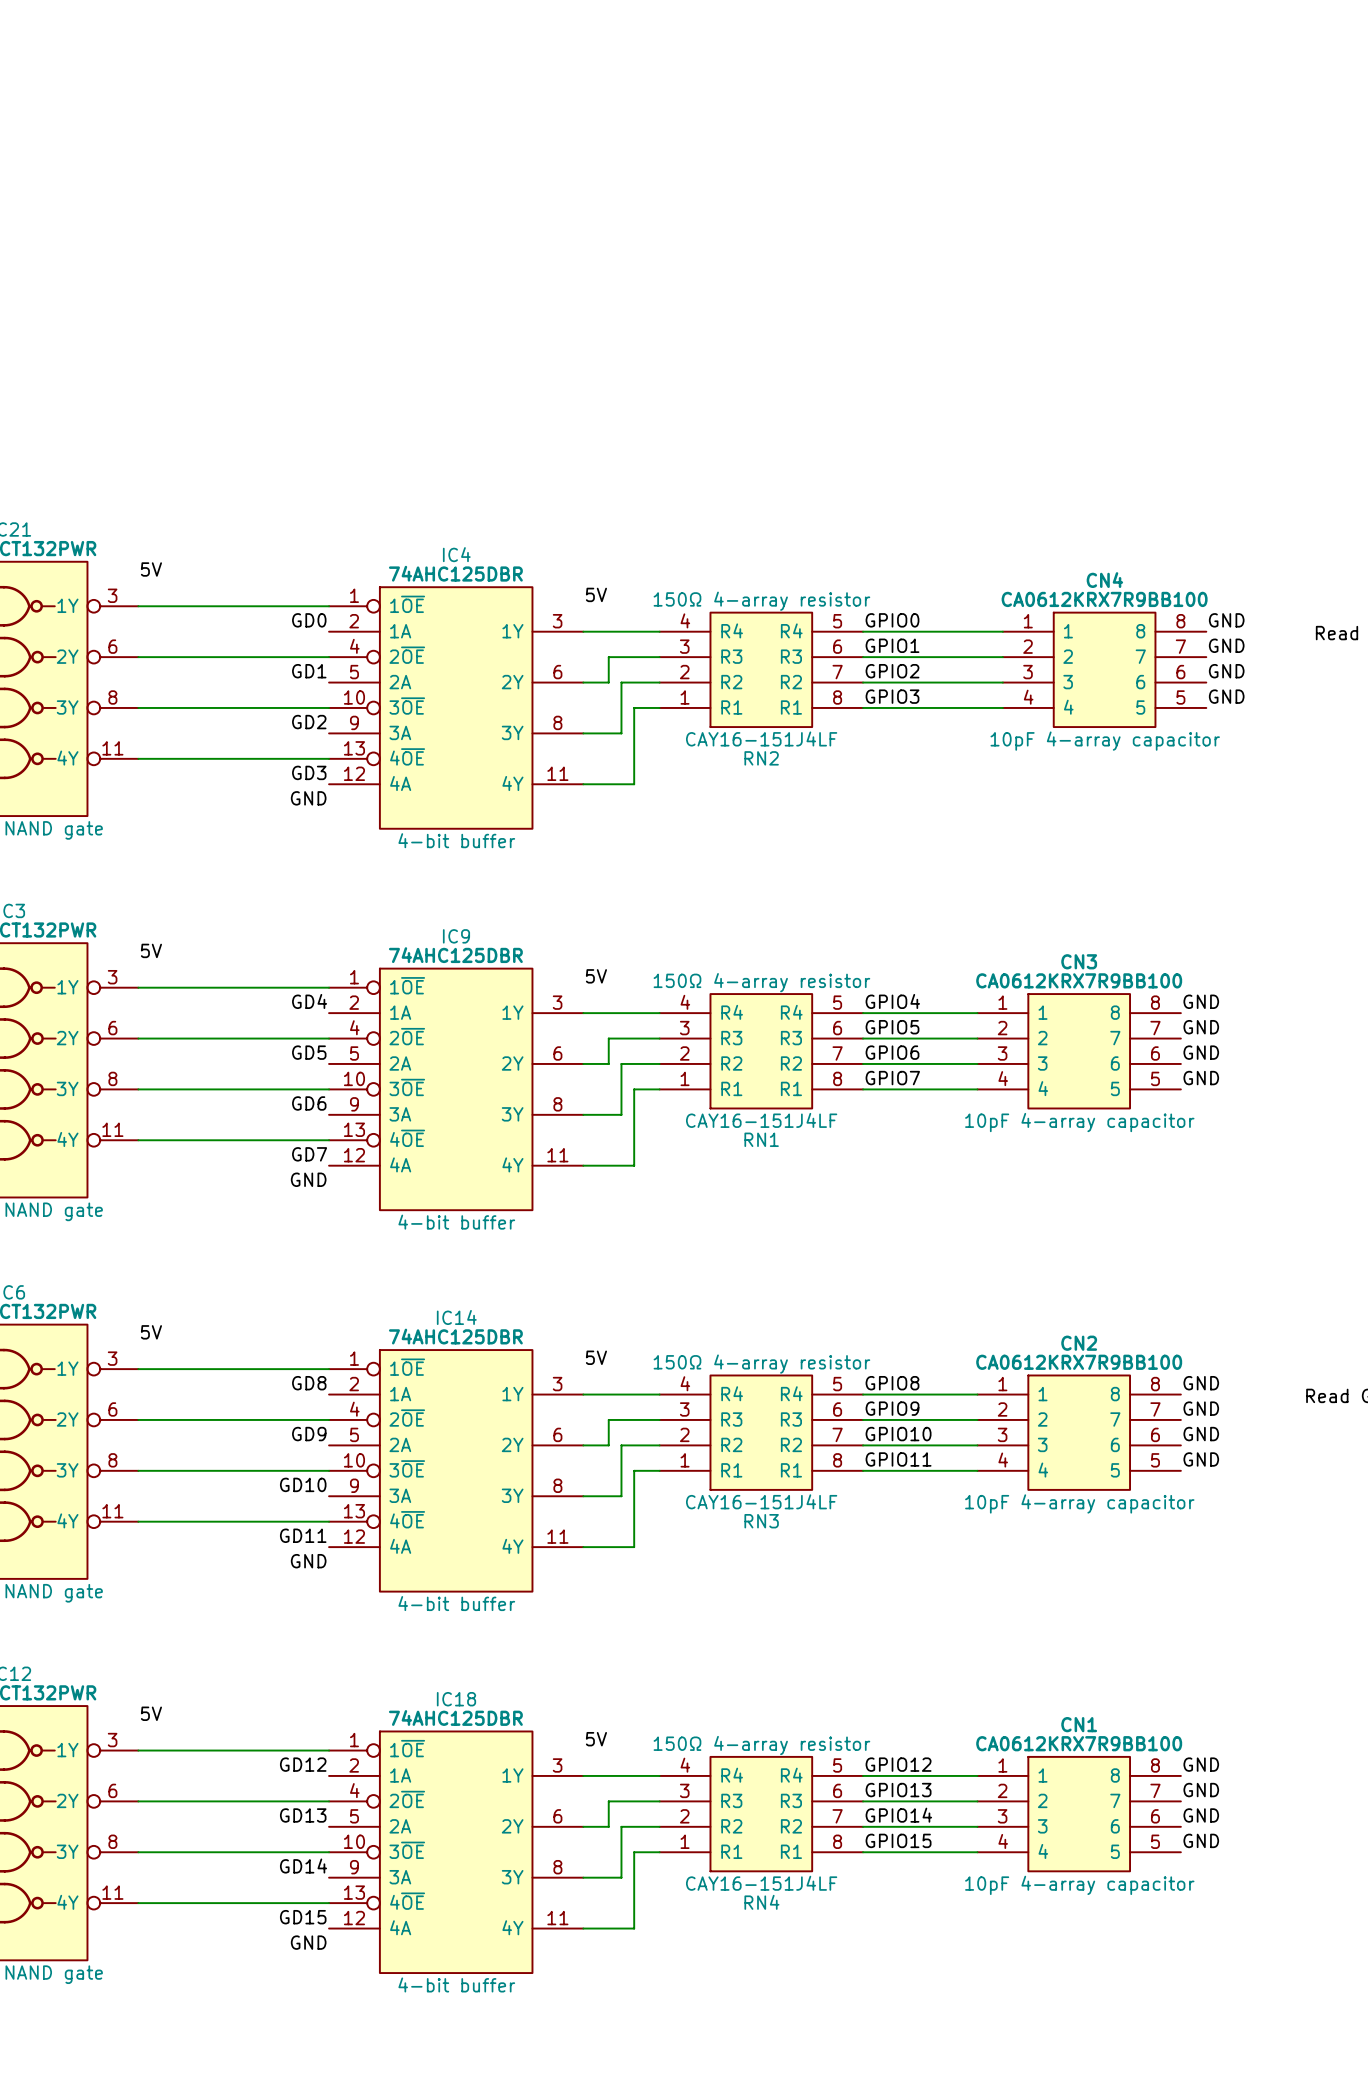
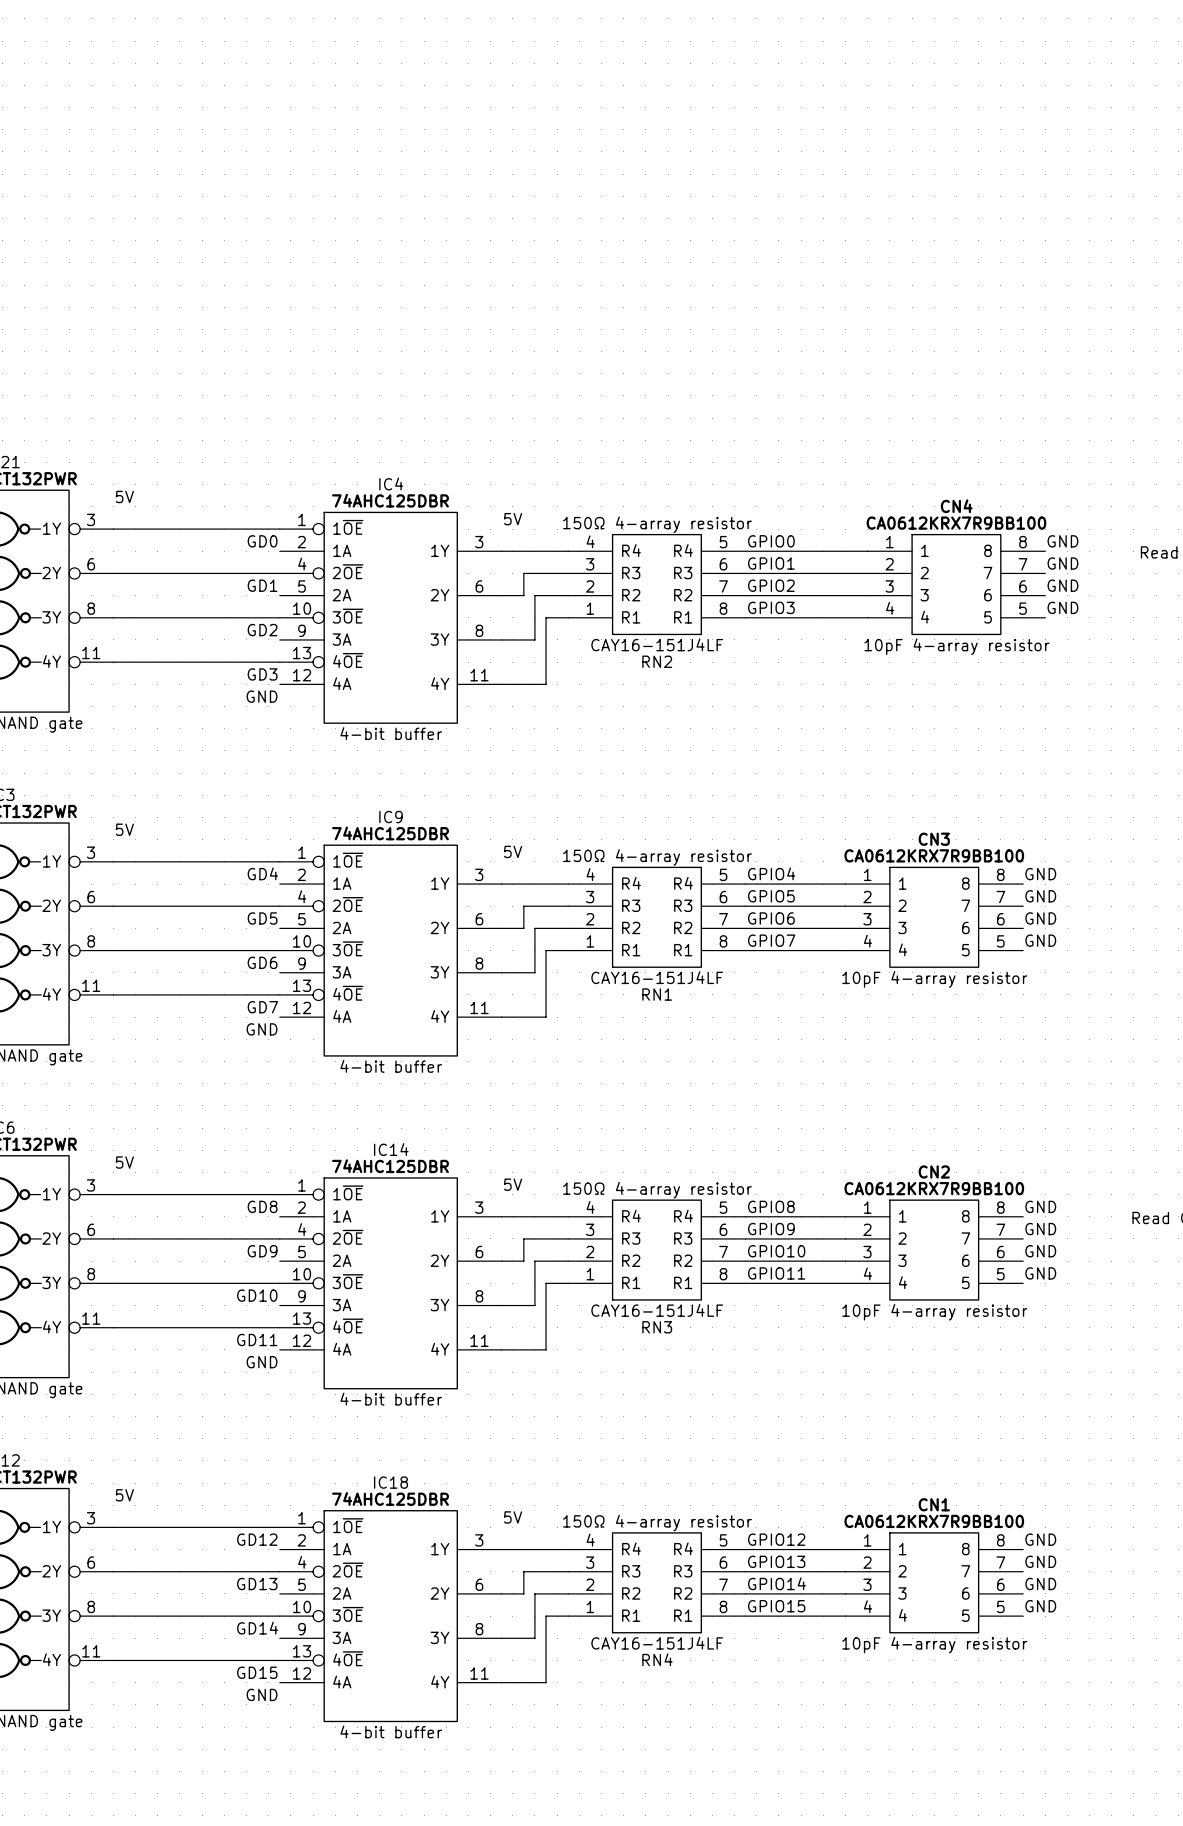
CN4 text: 10pF 4-array capacitor (1105, 741) -> 10pF 4-array resistor (956, 646)
CN3 text: 10pF 4-array capacitor (1079, 1122) -> 10pF 4-array resistor (934, 979)
CN2 text: 10pF 4-array capacitor (1079, 1503) -> 10pF 4-array resistor (934, 1312)
CN1 text: 10pF 4-array capacitor (1079, 1885) -> 10pF 4-array resistor (934, 1645)

